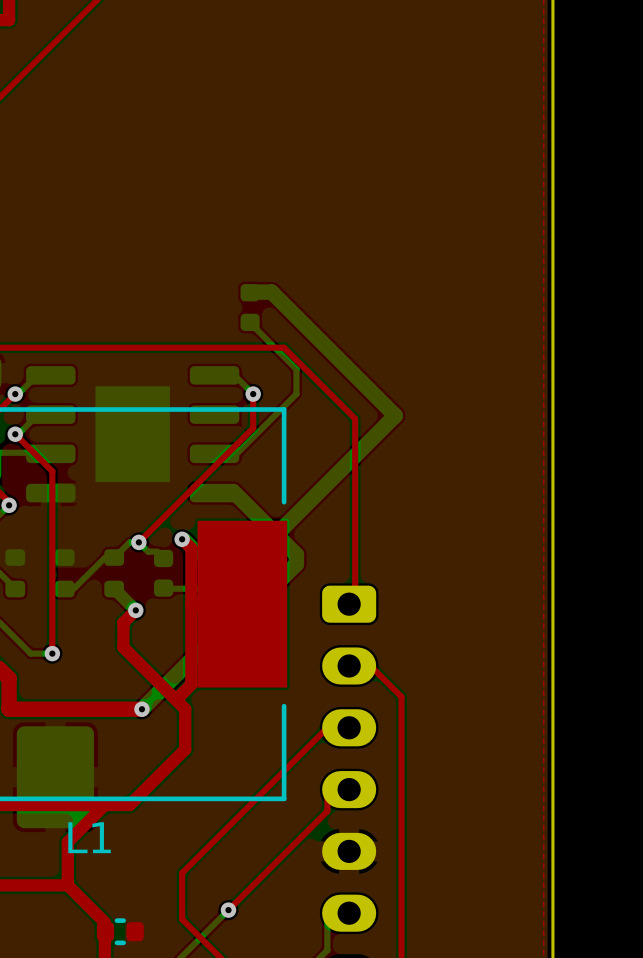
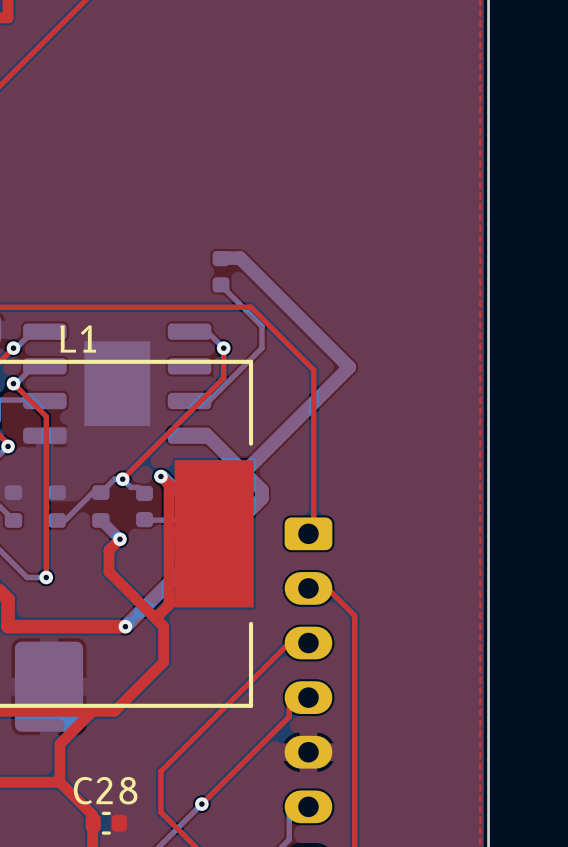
L1 name position: L1 (89, 837) -> L1 (78, 338)
part: (120, 931) -> none
C28: none -> (106, 823)

